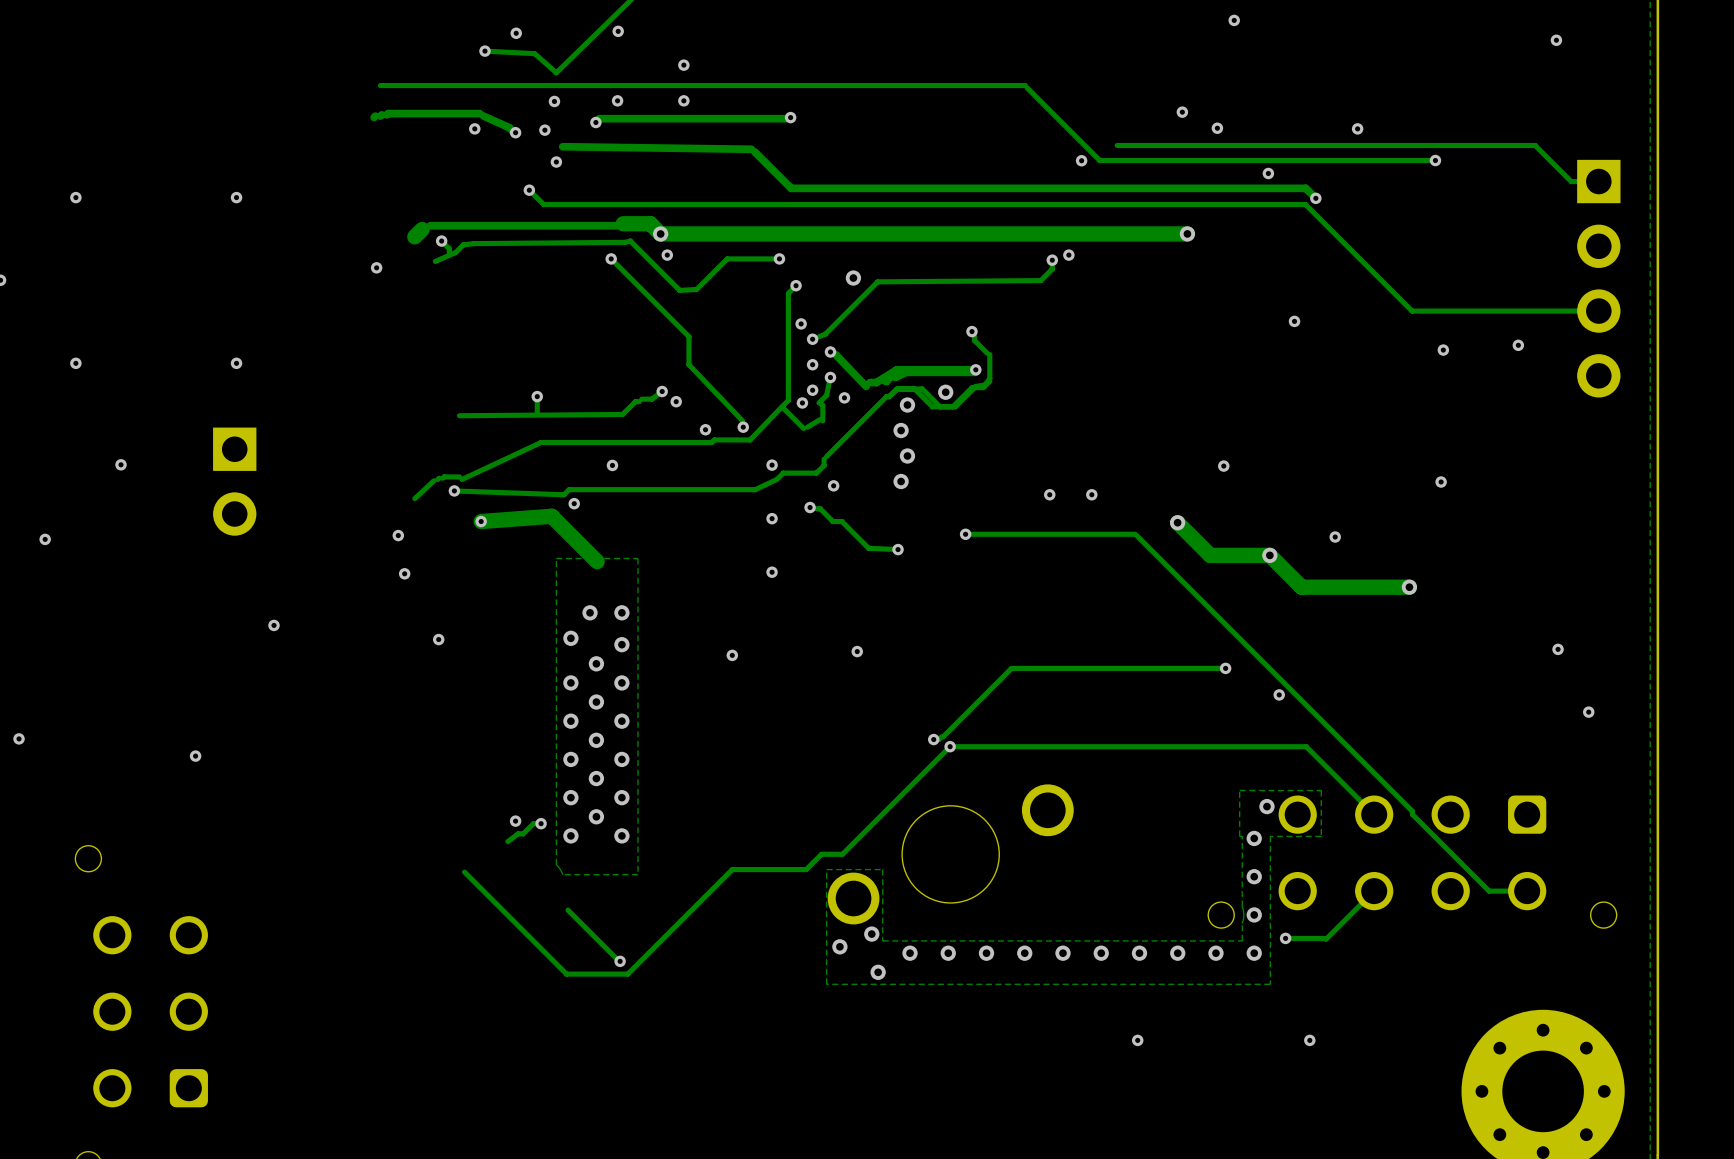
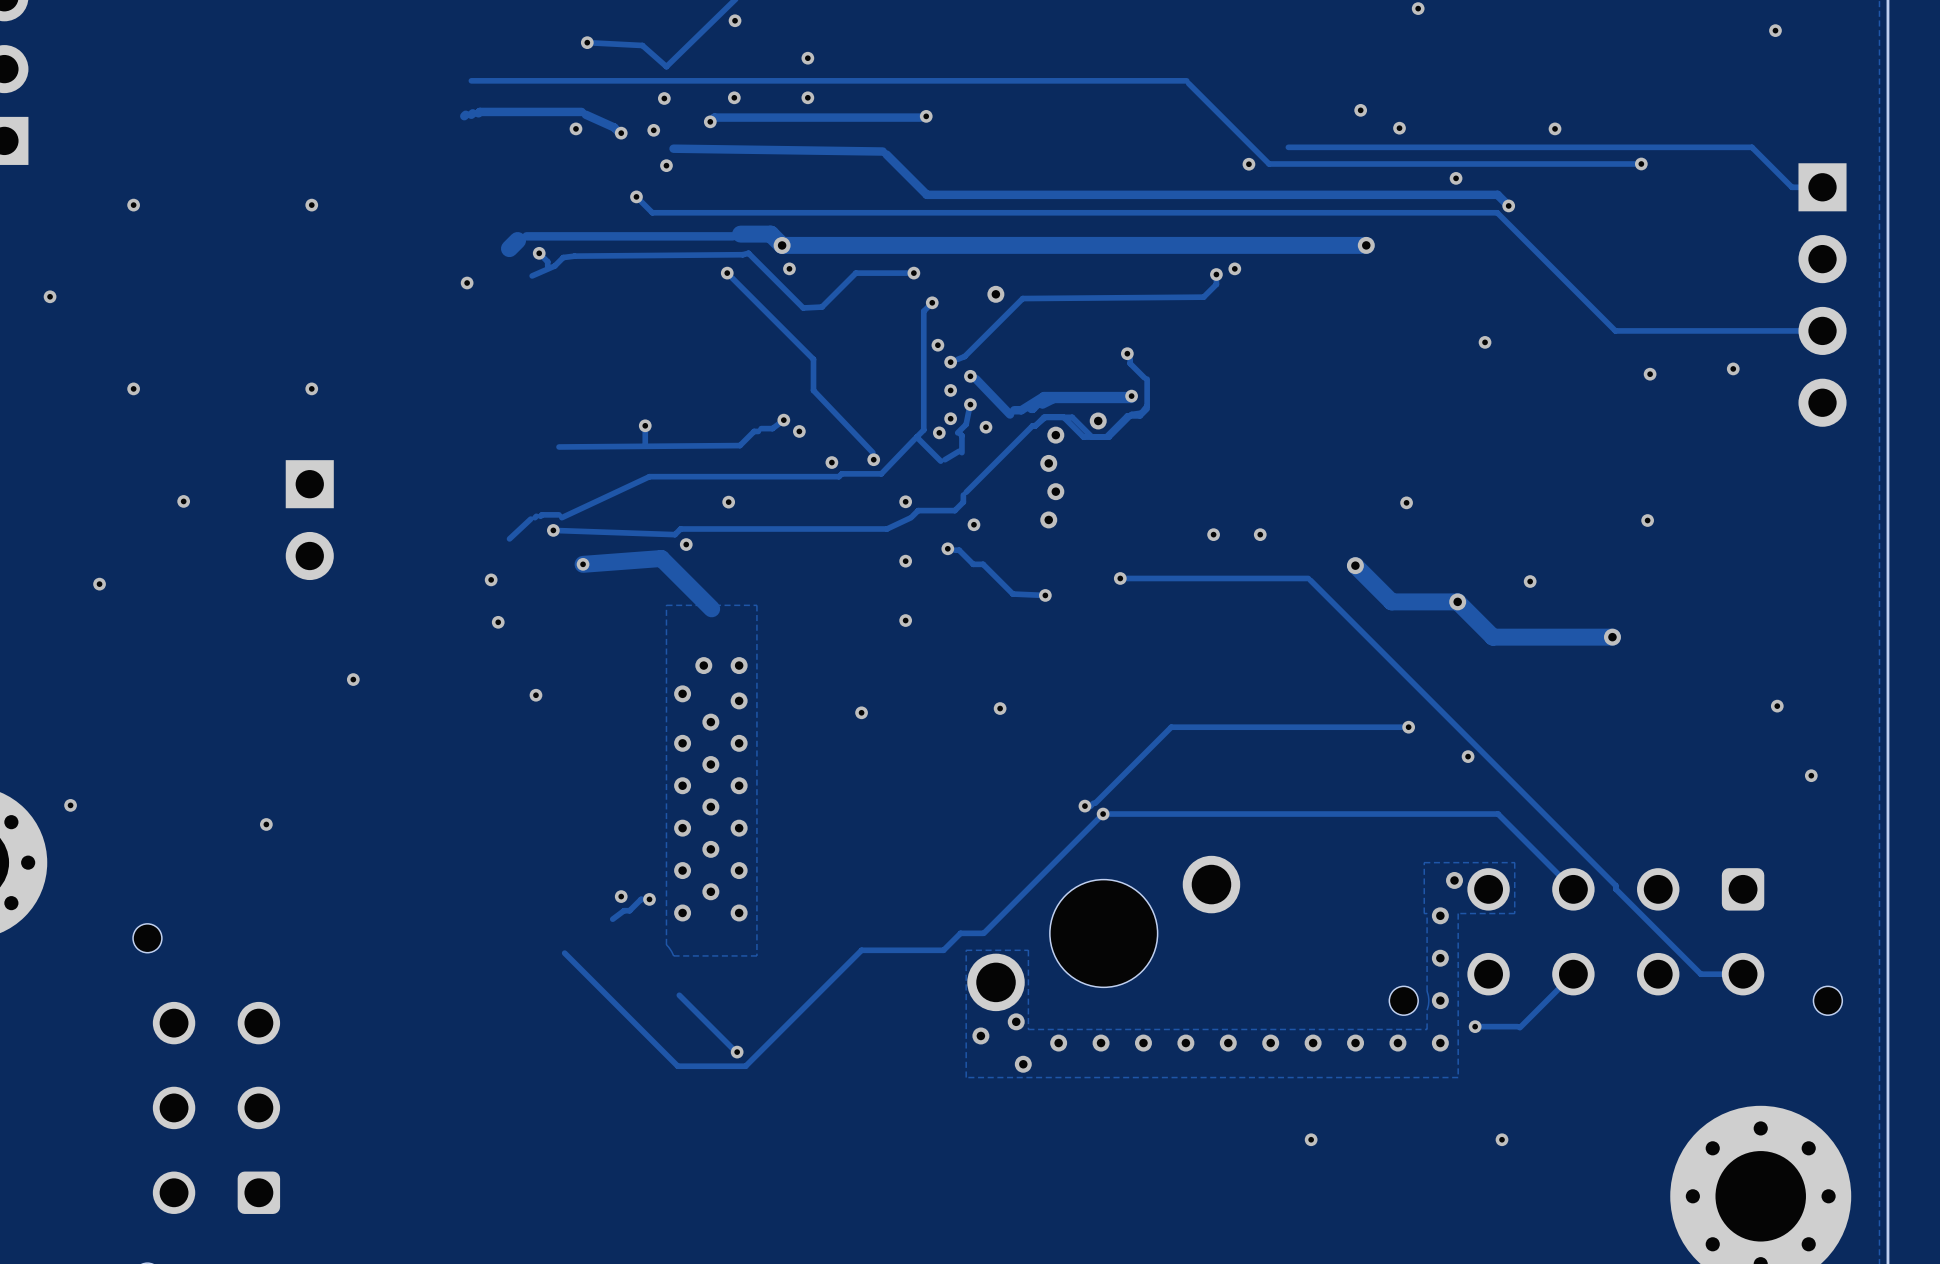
via: (516, 33) -> none

